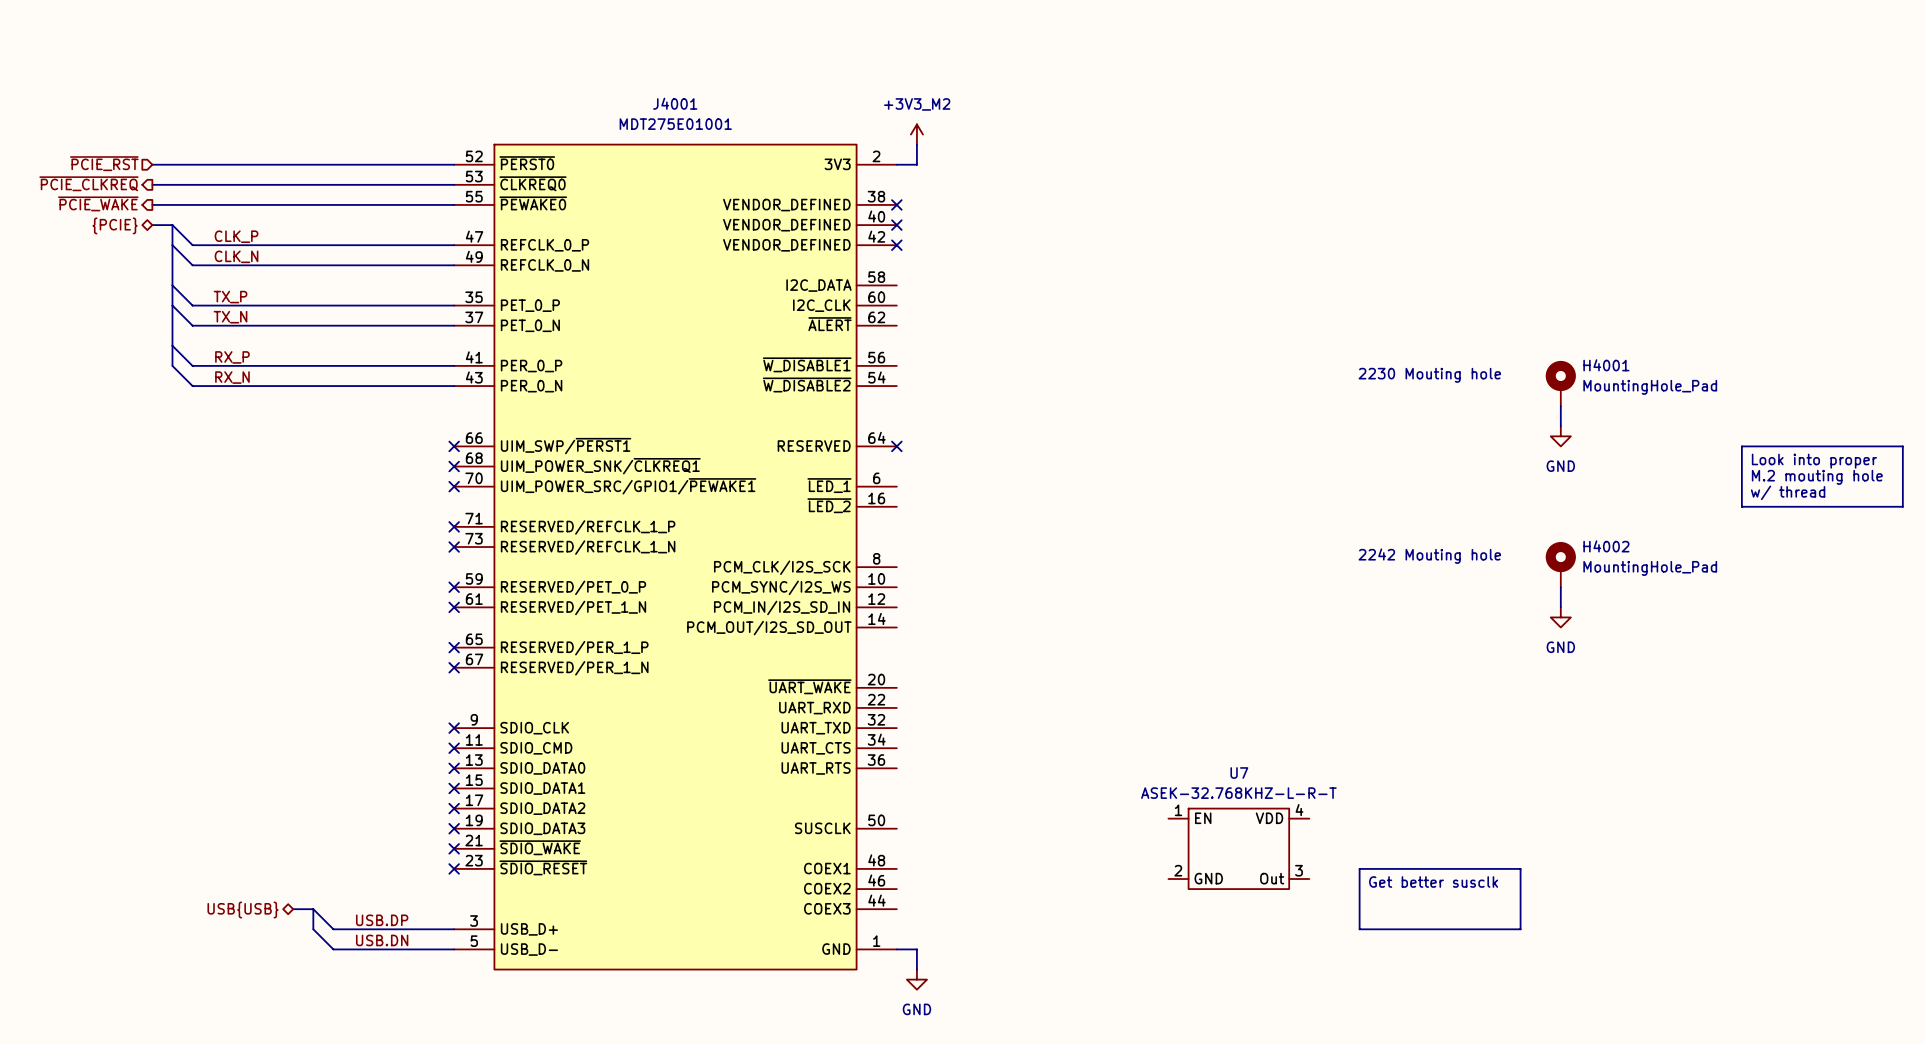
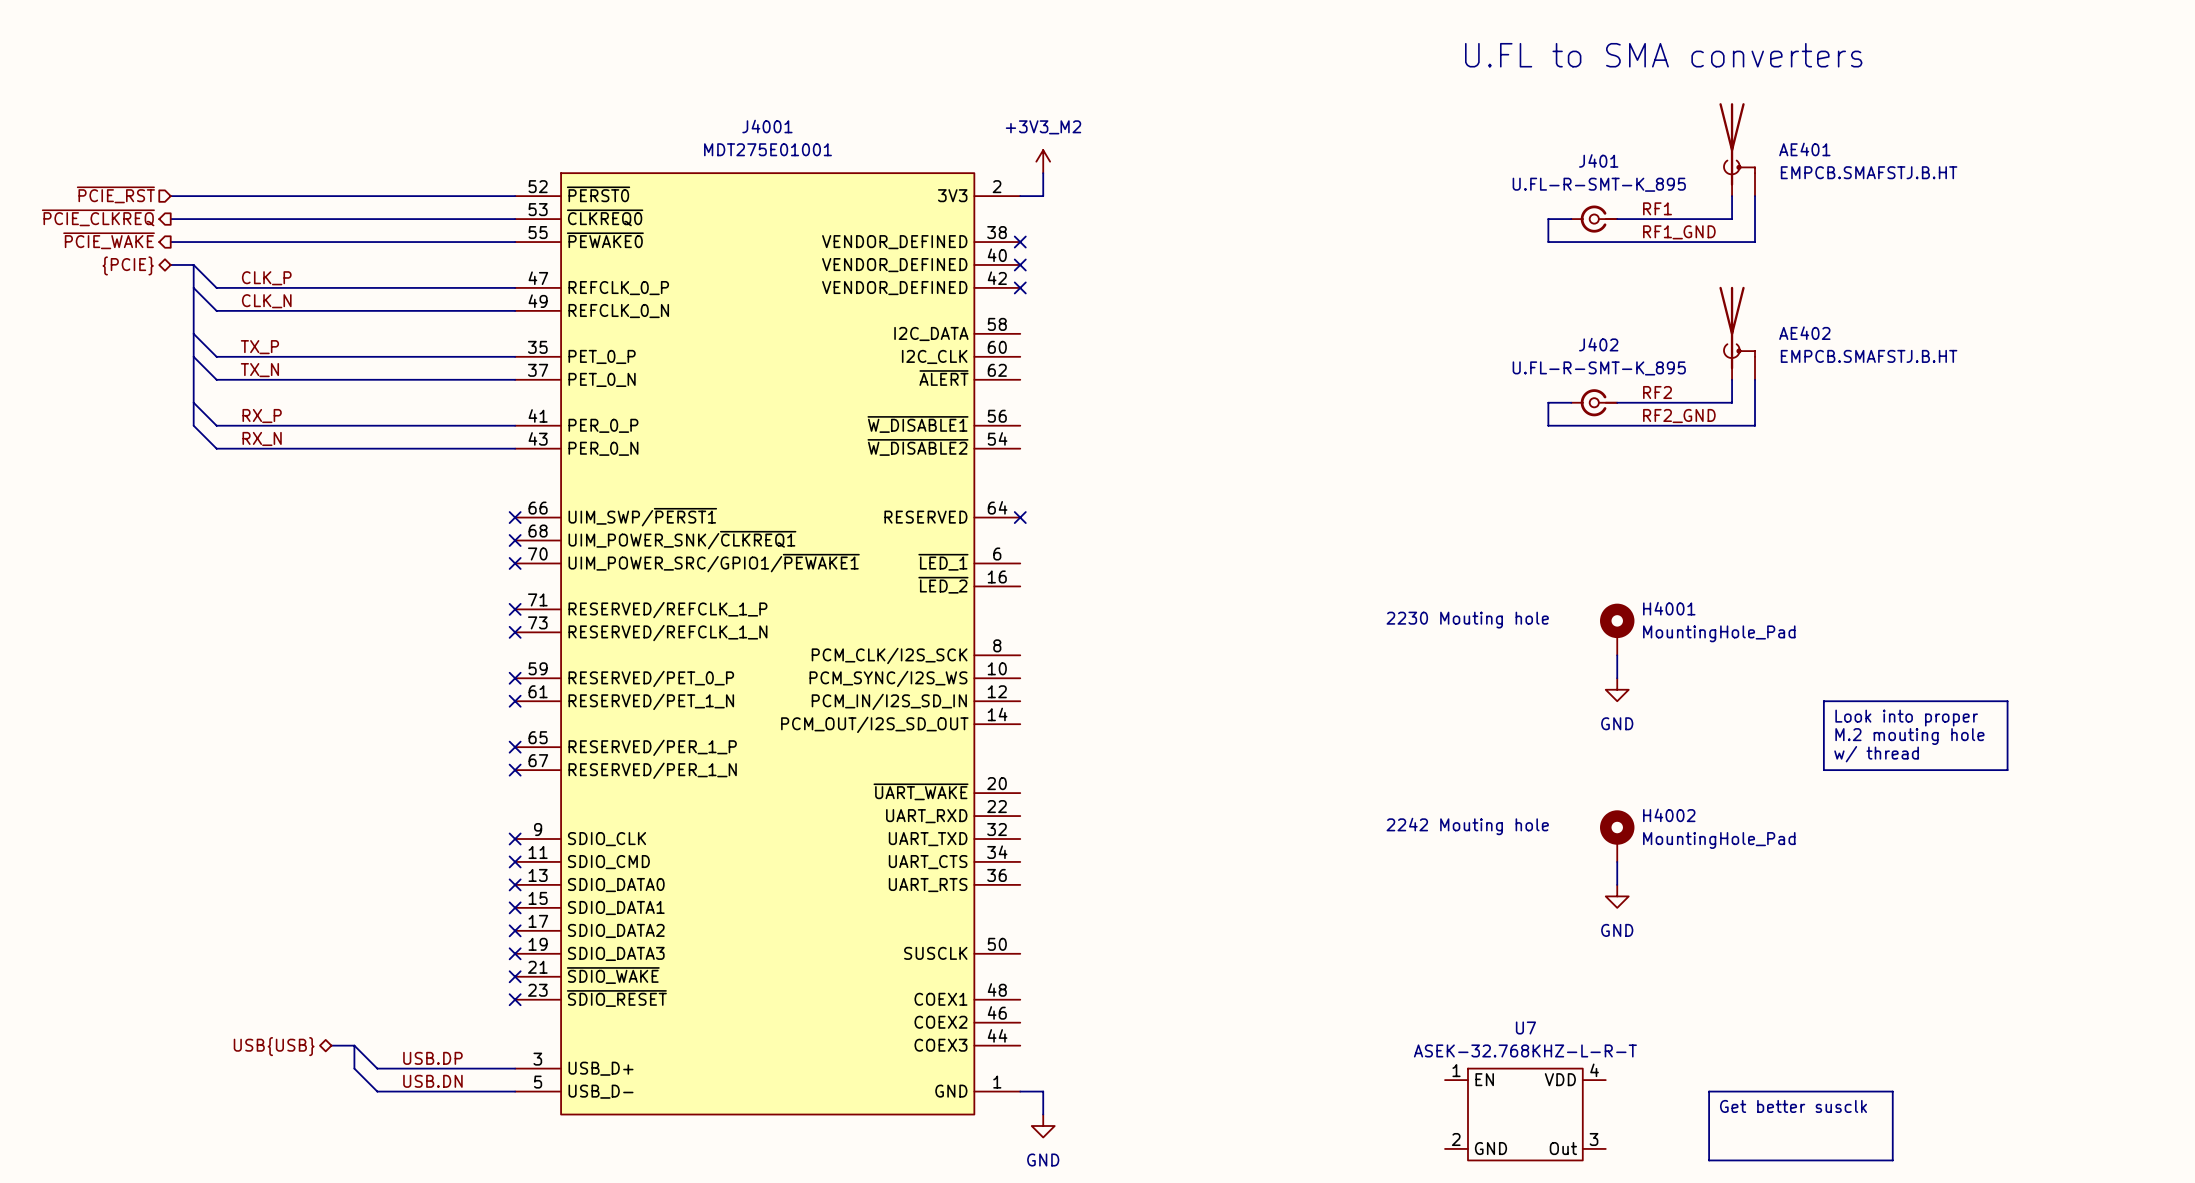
text: none -> U.FL to SMA converters (1663, 55)
AE401: none -> EMPCB.SMAFSTJ.B.HT (1737, 149)
wire: none -> (1732, 196) (1732, 219) (1617, 219)
wire: none -> (1755, 196) (1755, 242) (1548, 242) (1548, 219) (1571, 219)
label: none -> RF1 (1657, 208)
J401: none -> U.FL-R-SMT-K_895 (1594, 219)
label: none -> RF1_GND (1679, 232)
AE402: none -> EMPCB.SMAFSTJ.B.HT (1737, 333)
wire: none -> (1732, 379) (1732, 402) (1617, 402)
wire: none -> (1755, 379) (1755, 425) (1548, 425) (1548, 402) (1571, 402)
label: none -> RF2 (1657, 392)
J402: none -> U.FL-R-SMT-K_895 (1594, 402)
label: none -> RF2_GND (1679, 416)
text: 2230 Mouting hole (1429, 375) -> none
H4001 position: (1560, 383) -> (1617, 629)
wire: (1560, 406) (1560, 426) -> none
power symbol: GND (1560, 436) -> none
line: (1741, 446) (1902, 446) (1902, 506) (1741, 506) (1741, 446) -> none
text: Look into proper (1814, 461) -> none
text: M.2 mouting hole (1817, 477) -> none
text: w/ thread (1788, 492) -> none
text: 2242 Mouting hole (1429, 556) -> 2230 Mouting hole (1467, 620)
H4002 position: (1560, 564) -> (1617, 836)
wire: (1560, 587) (1560, 607) -> (1617, 655) (1617, 678)
power symbol: none -> GND (1617, 689)
line: none -> (1823, 701) (2007, 701) (2007, 770) (1823, 770) (1823, 701)
power symbol: GND (1560, 617) -> none
text: none -> Look into proper (1906, 718)
text: none -> M.2 mouting hole (1909, 736)
text: none -> w/ thread (1876, 754)
text: none -> 2242 Mouting hole (1467, 826)
wire: none -> (1617, 861) (1617, 884)
power symbol: none -> GND (1617, 896)
U7 position: (1238, 848) -> (1525, 1114)
line: (1359, 868) (1520, 868) (1520, 929) (1359, 929) (1359, 868) -> (1709, 1091) (1892, 1091) (1892, 1160) (1709, 1160) (1709, 1091)
text position: Get better susclk (1433, 882) -> Get better susclk (1793, 1106)

